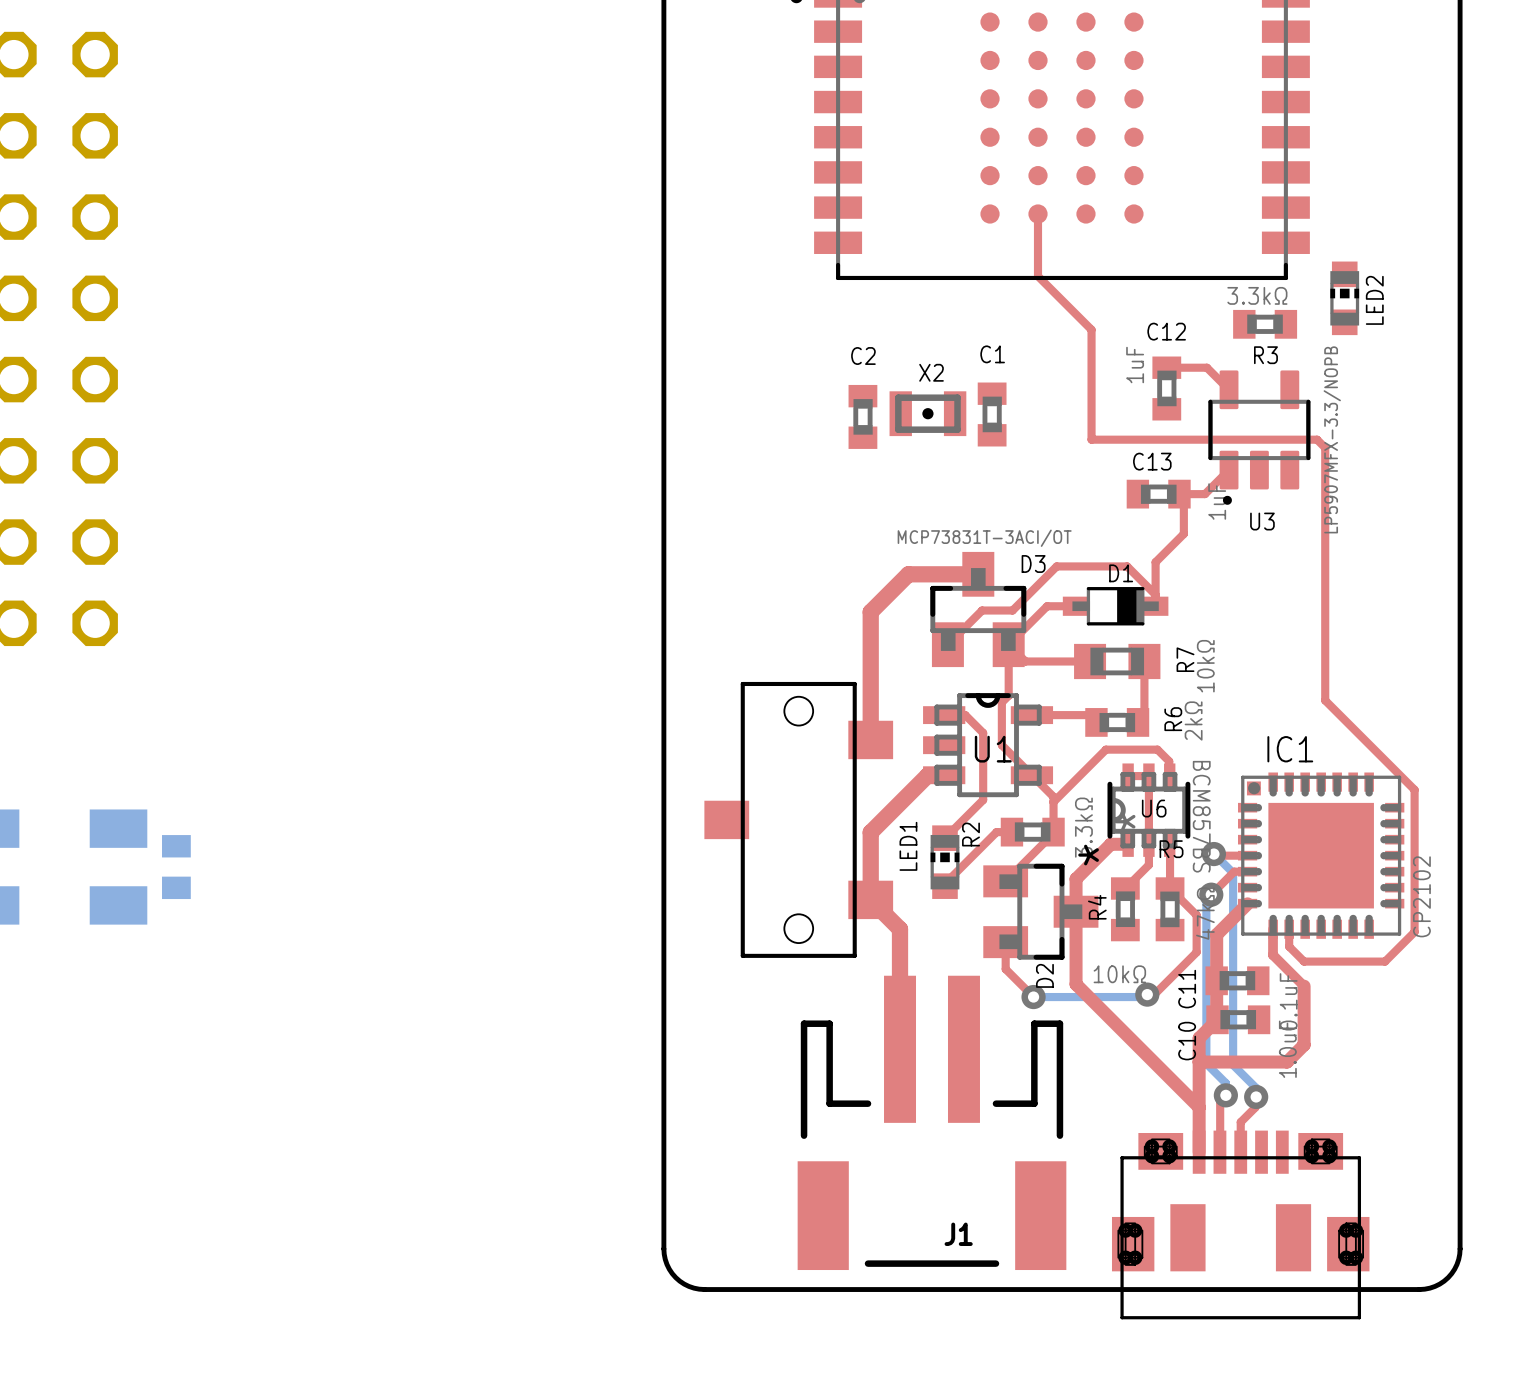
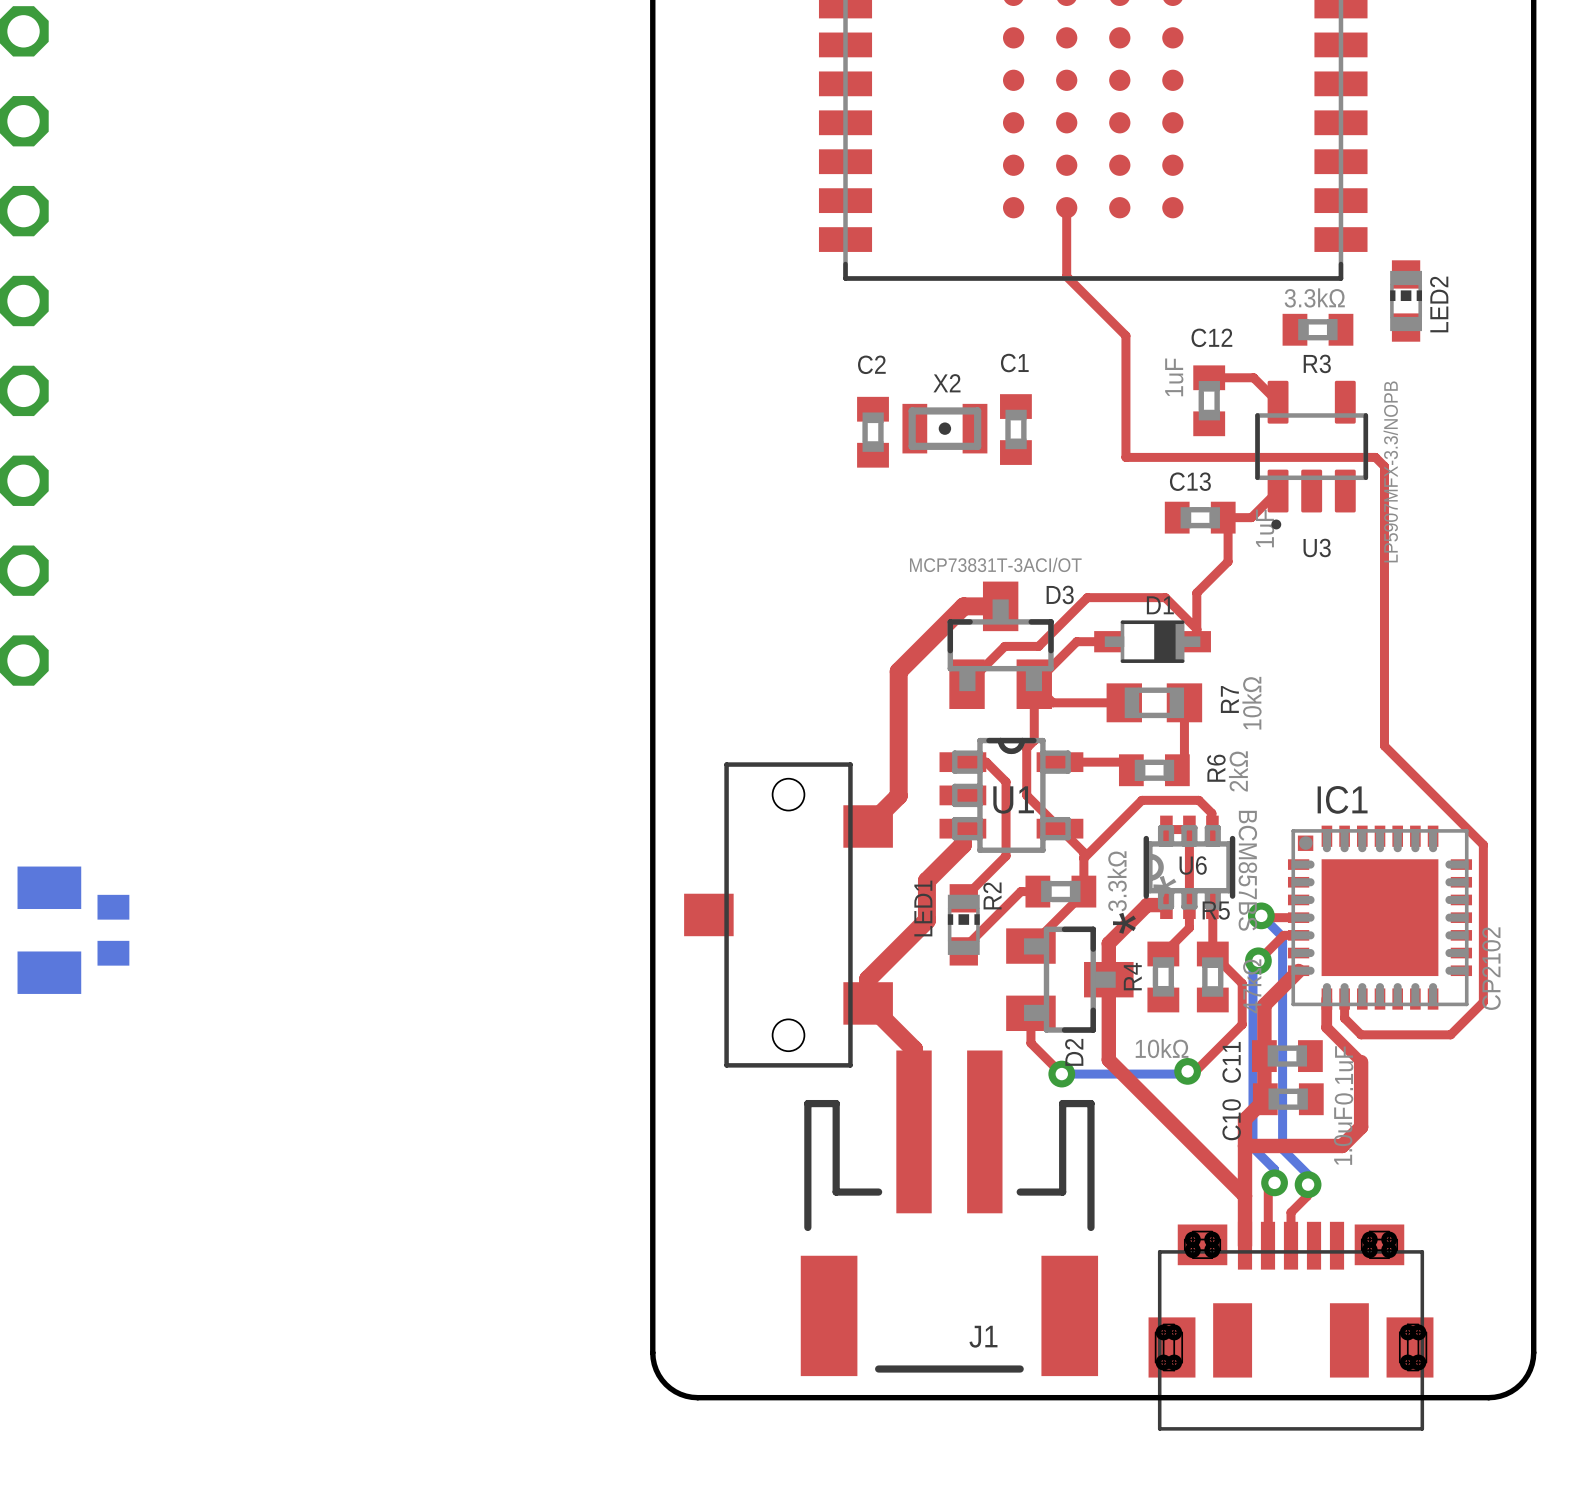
top track: (944, 574) (908, 574) (870, 612) (870, 739) -> (963, 606) (898, 671) (898, 795) (868, 826)
top track: (944, 775) (927, 775) (870, 832) (870, 899) (900, 929) (900, 974) -> (962, 828) (962, 844) (926, 880) (926, 920) (868, 979) (868, 1003) (914, 1049)
part position: (798, 819) -> (788, 914)

